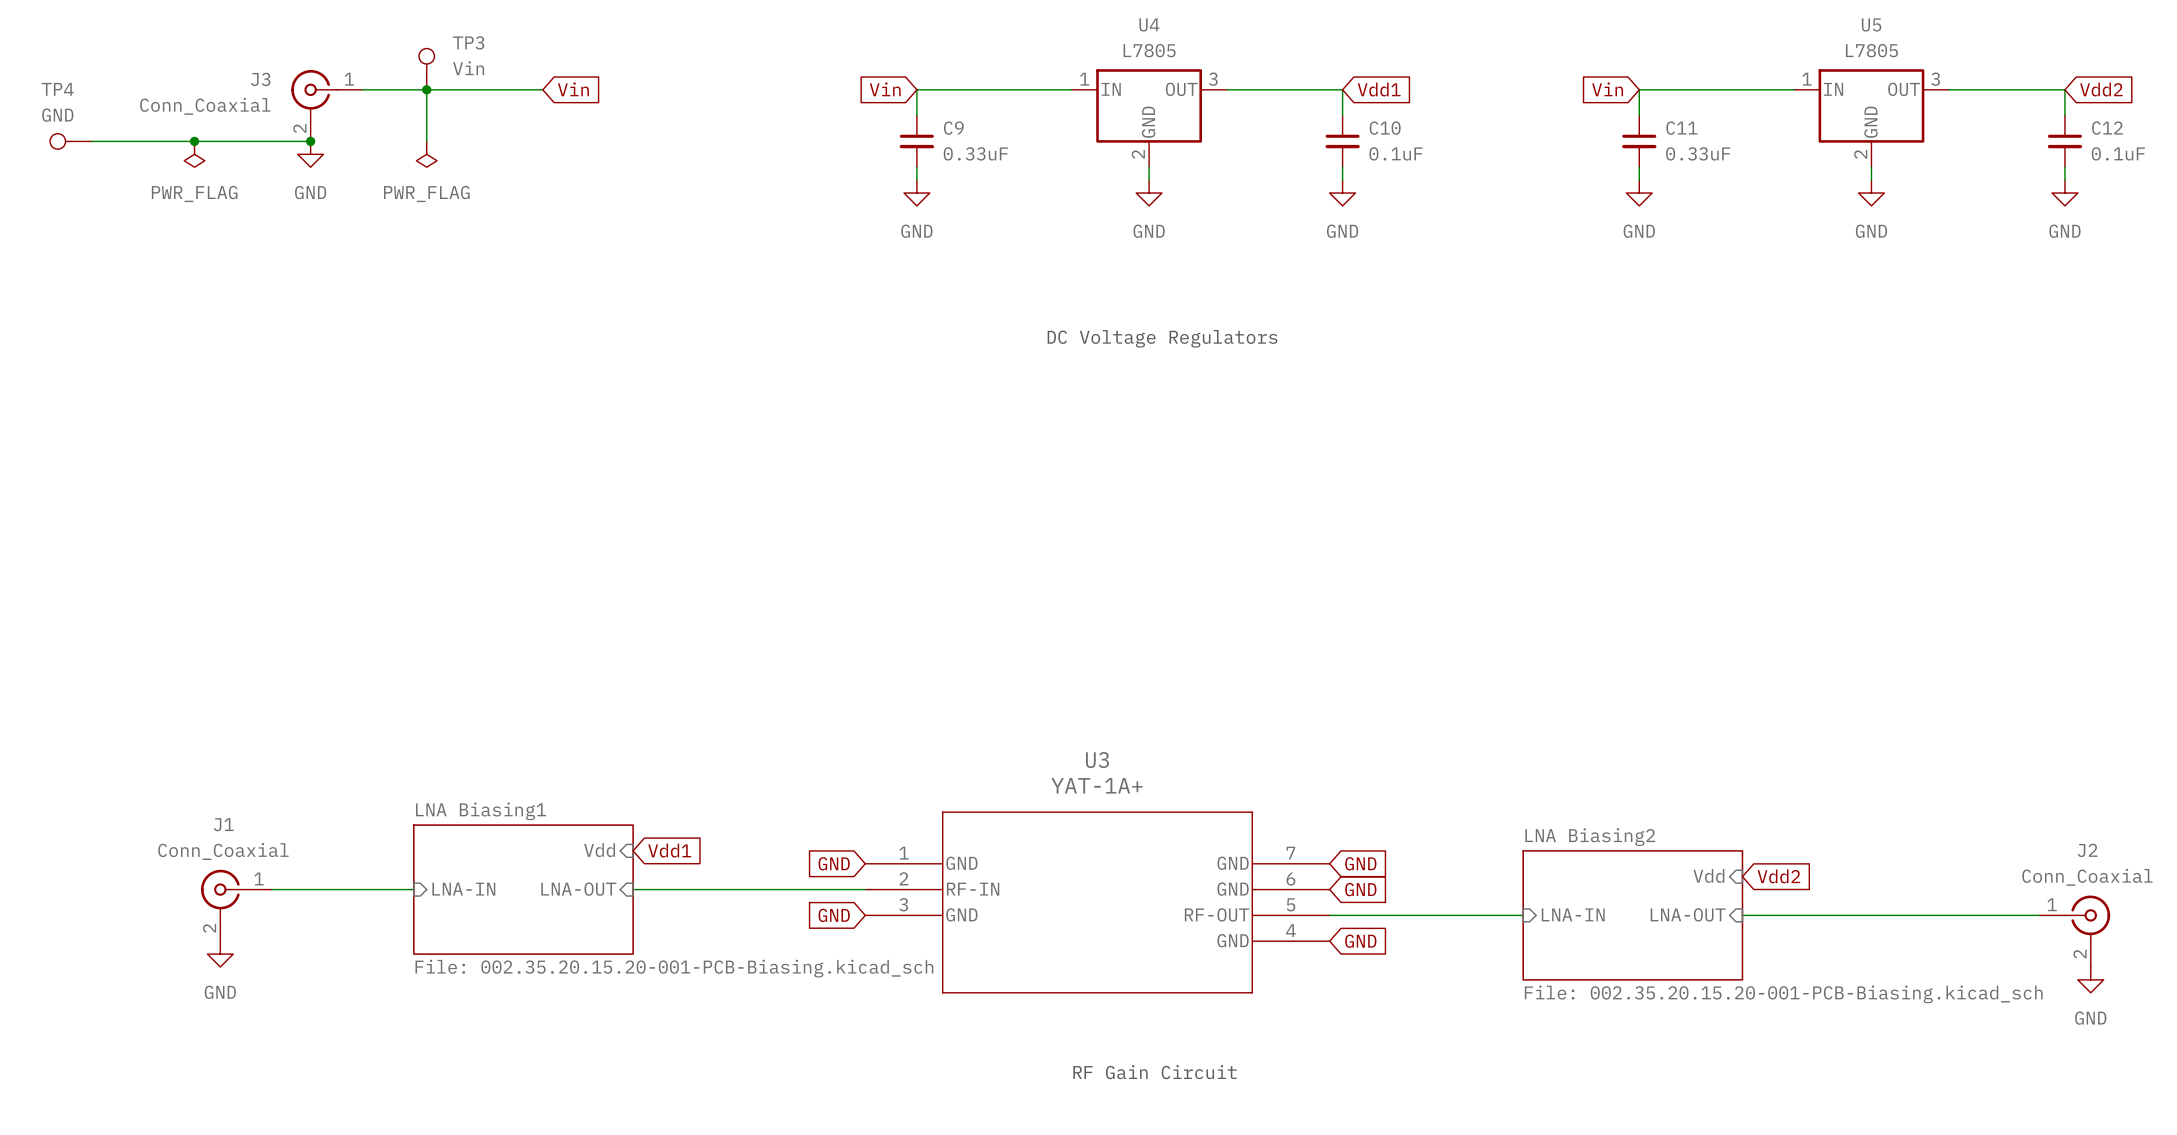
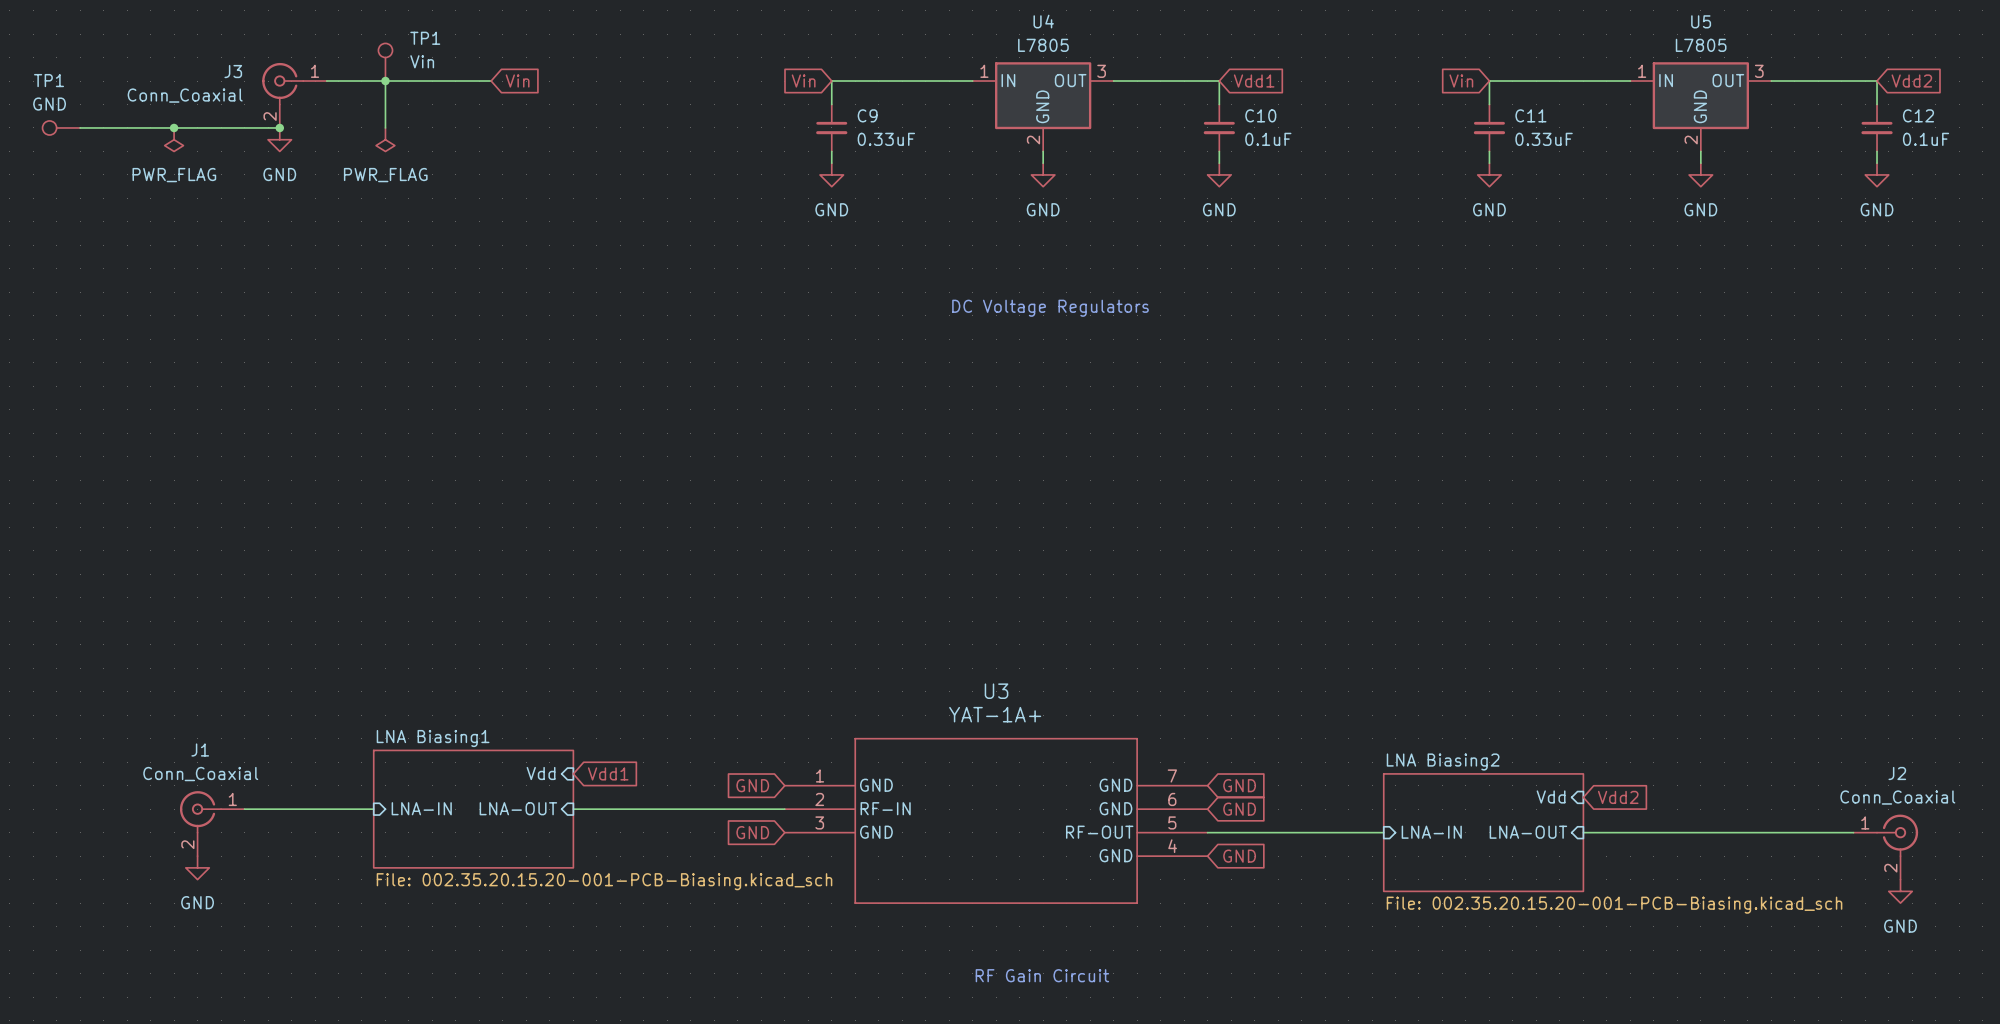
TP3 name: TP3 (468, 42) -> TP1 (425, 38)
TP4 name: TP4 (57, 89) -> TP1 (49, 80)

